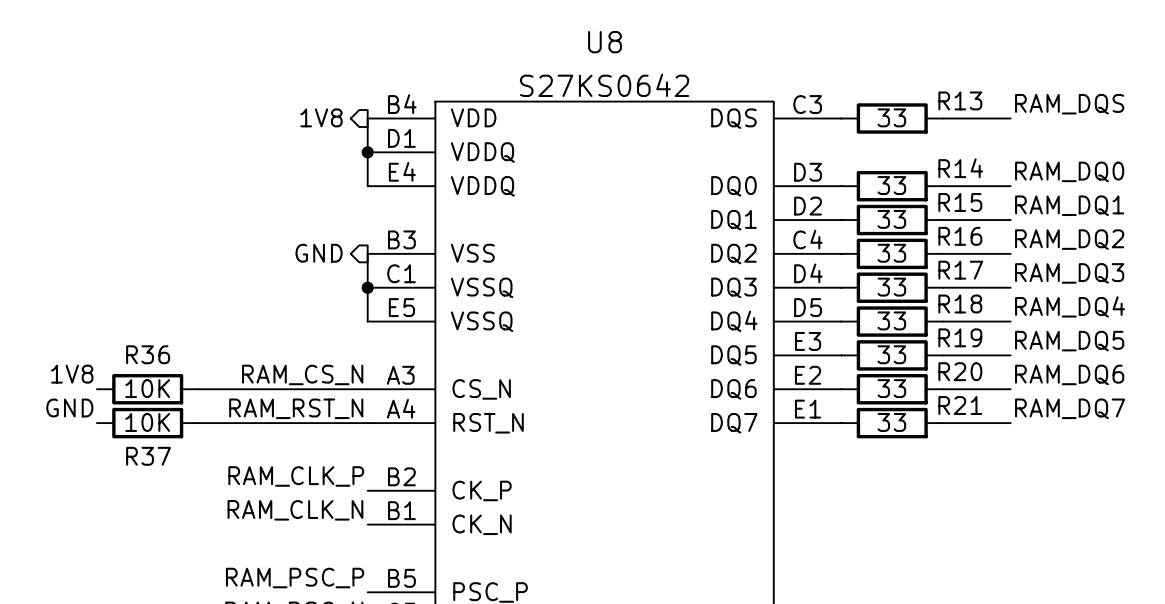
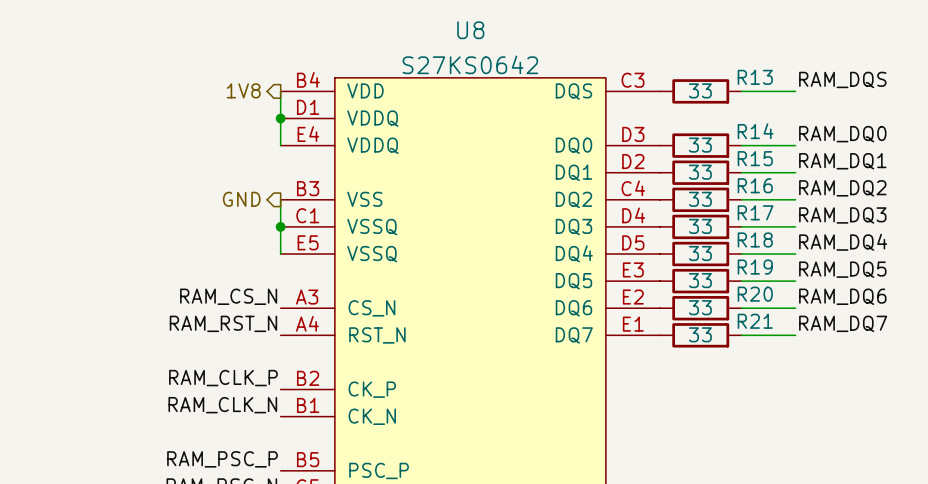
label: 1V8 (72, 374) -> none
R36: 10K (147, 389) -> none
wire: (198, 389) (367, 389) -> none
label: GND (69, 407) -> none
R37: 10K (147, 423) -> none
wire: (198, 423) (367, 423) -> none

